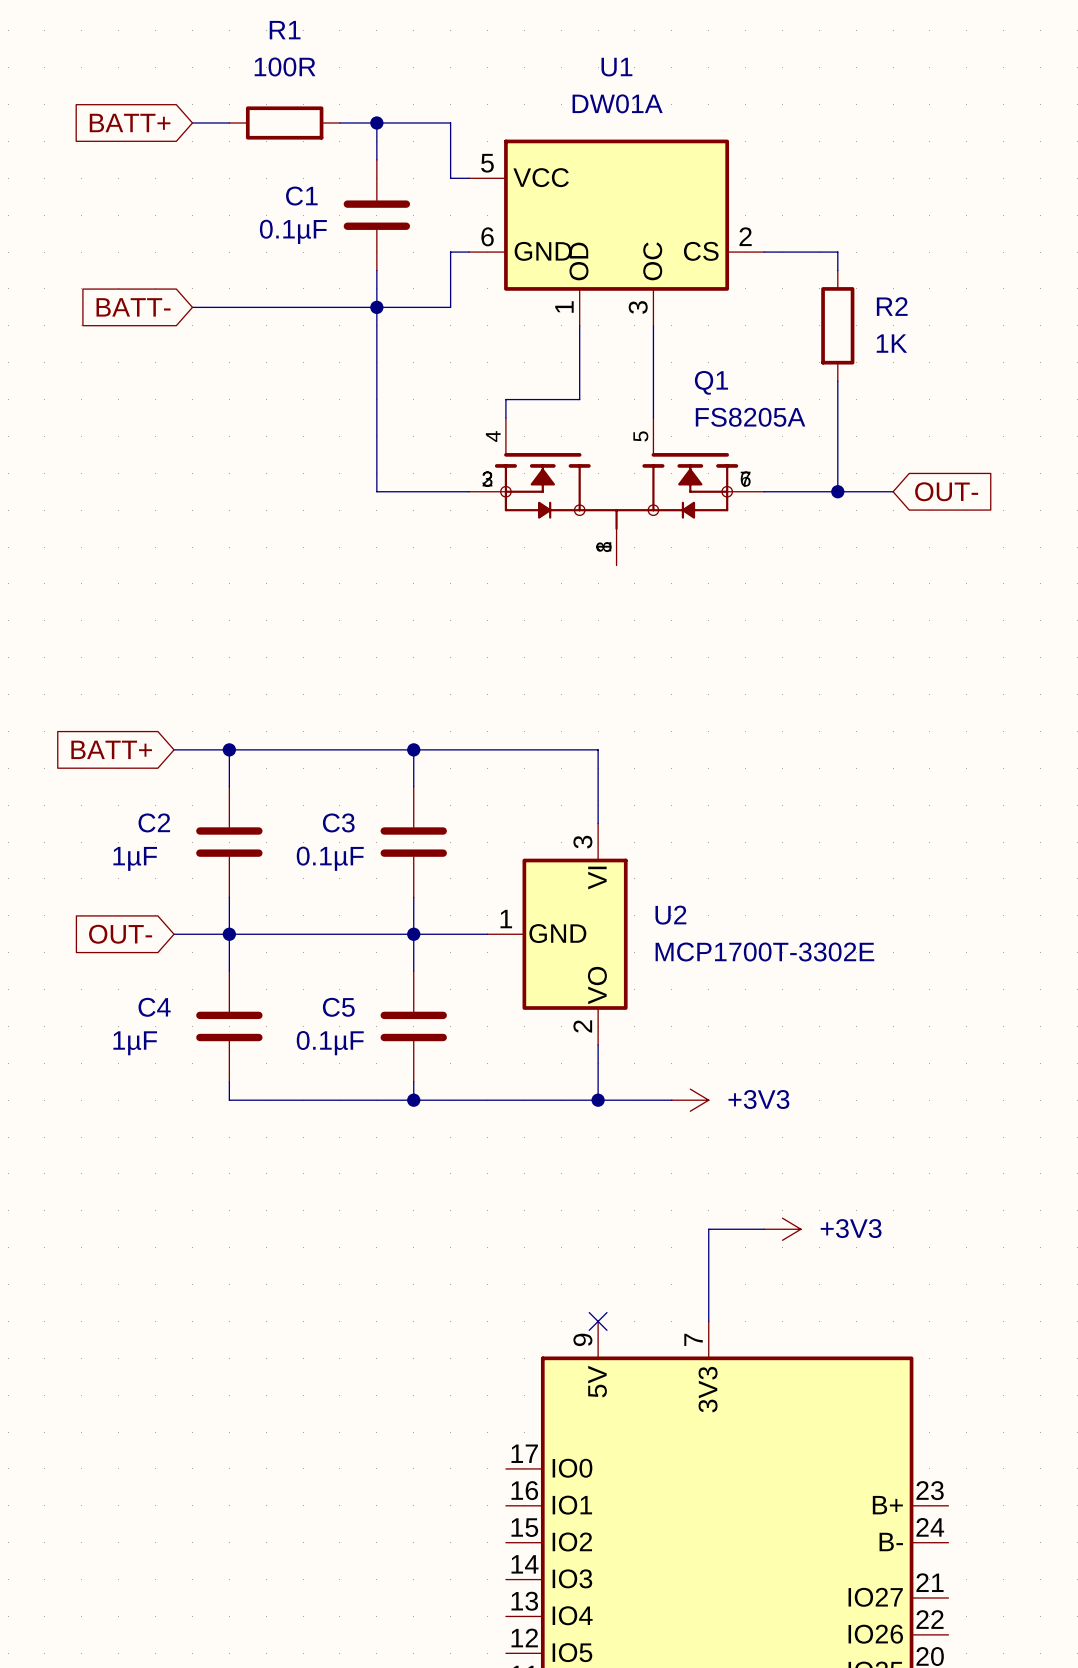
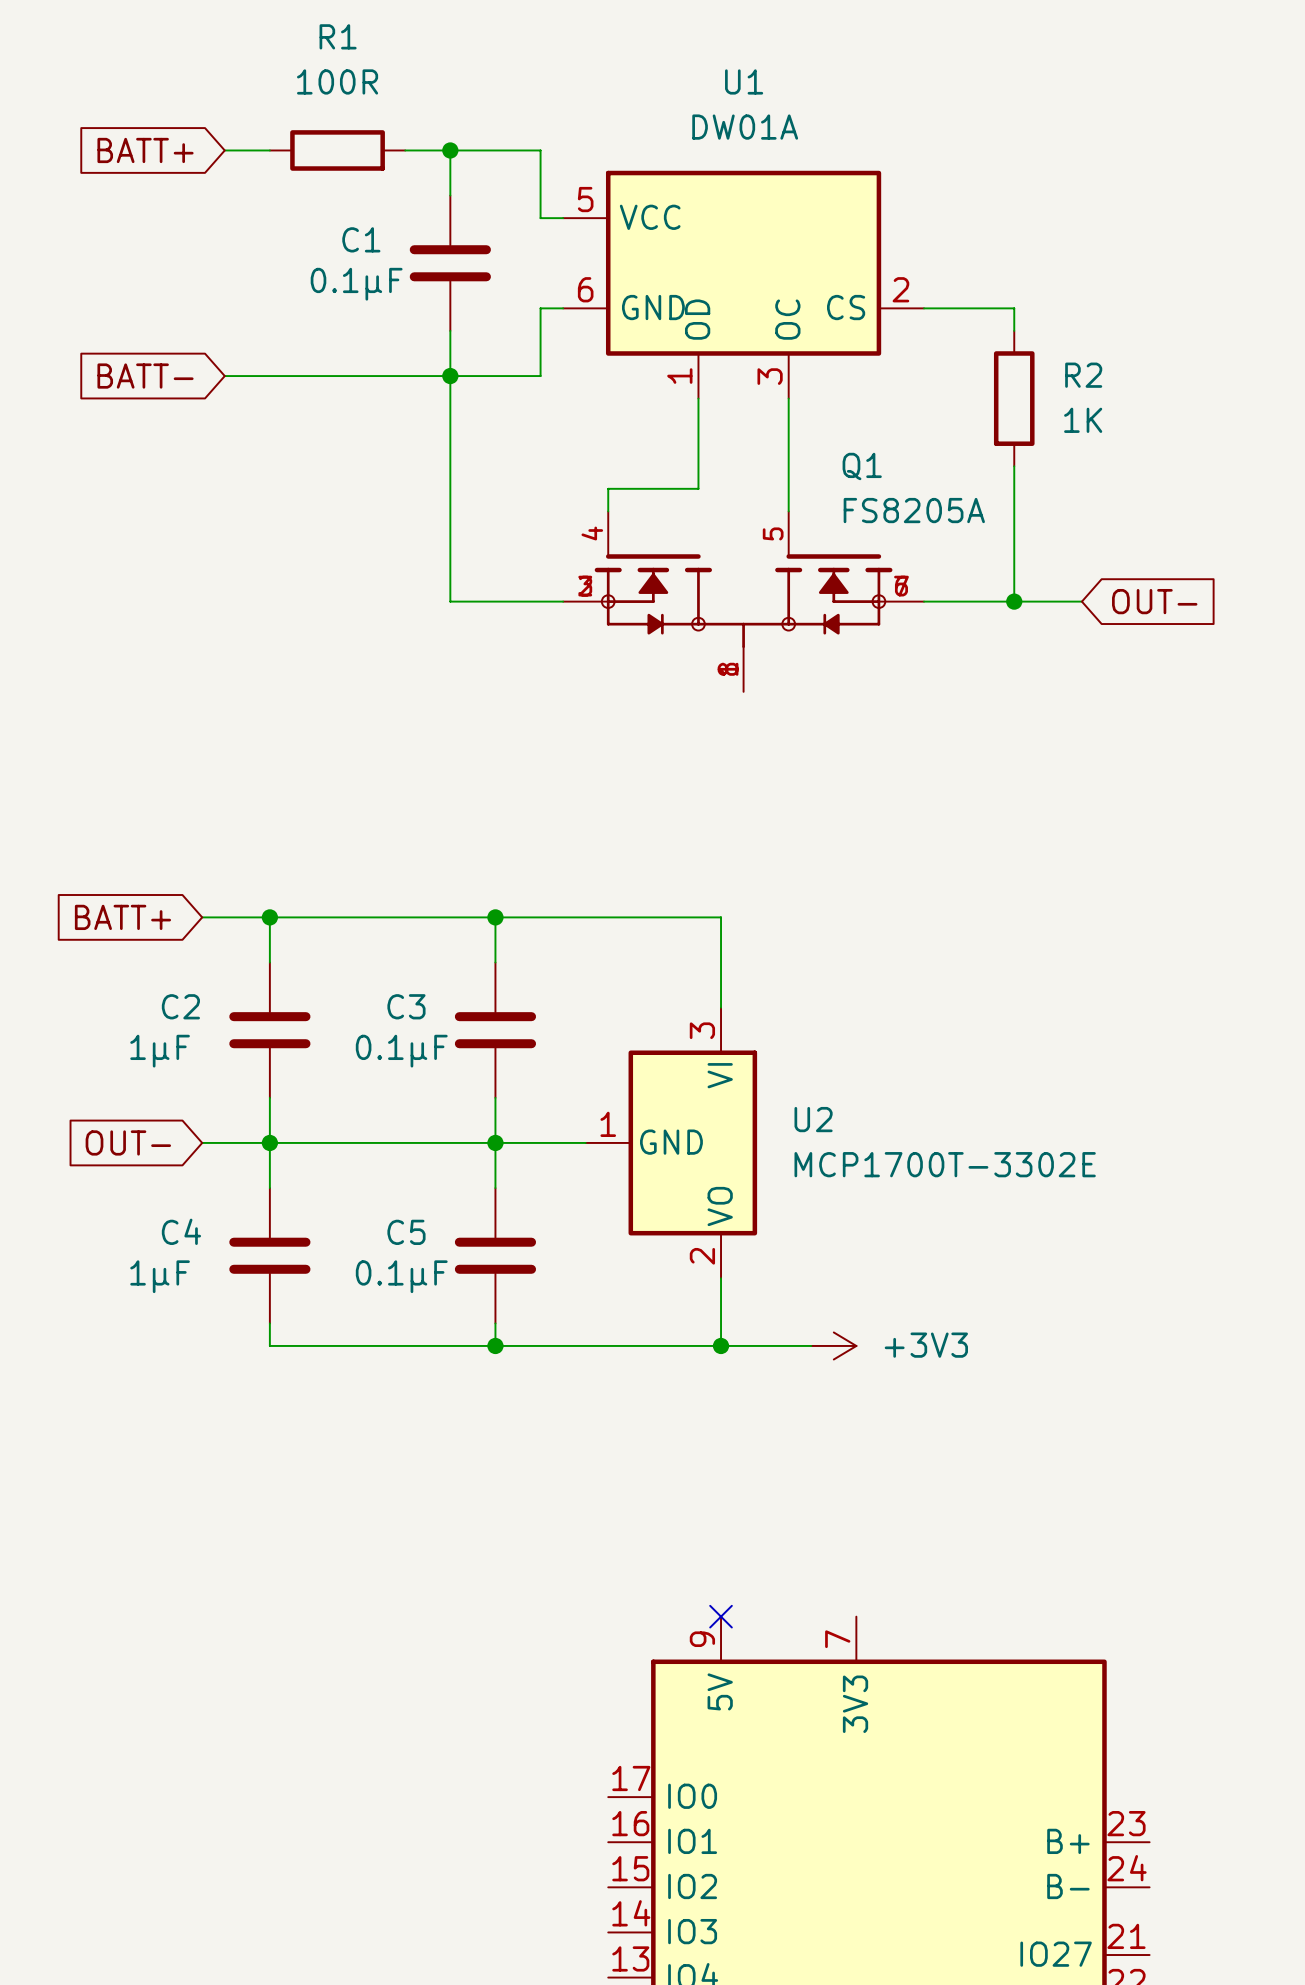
wire: (764, 1229) (708, 1229) (708, 1321) -> none
power symbol: +3V3 (782, 1229) -> none

